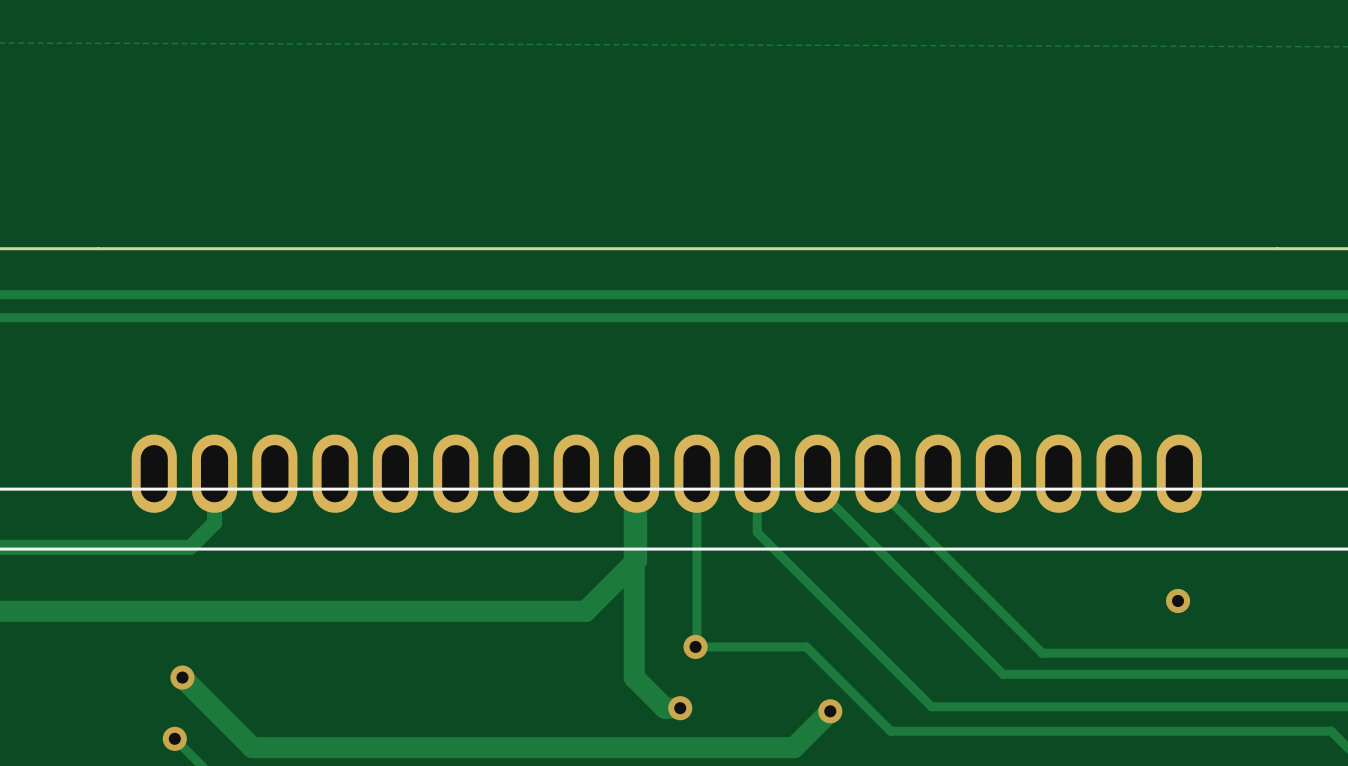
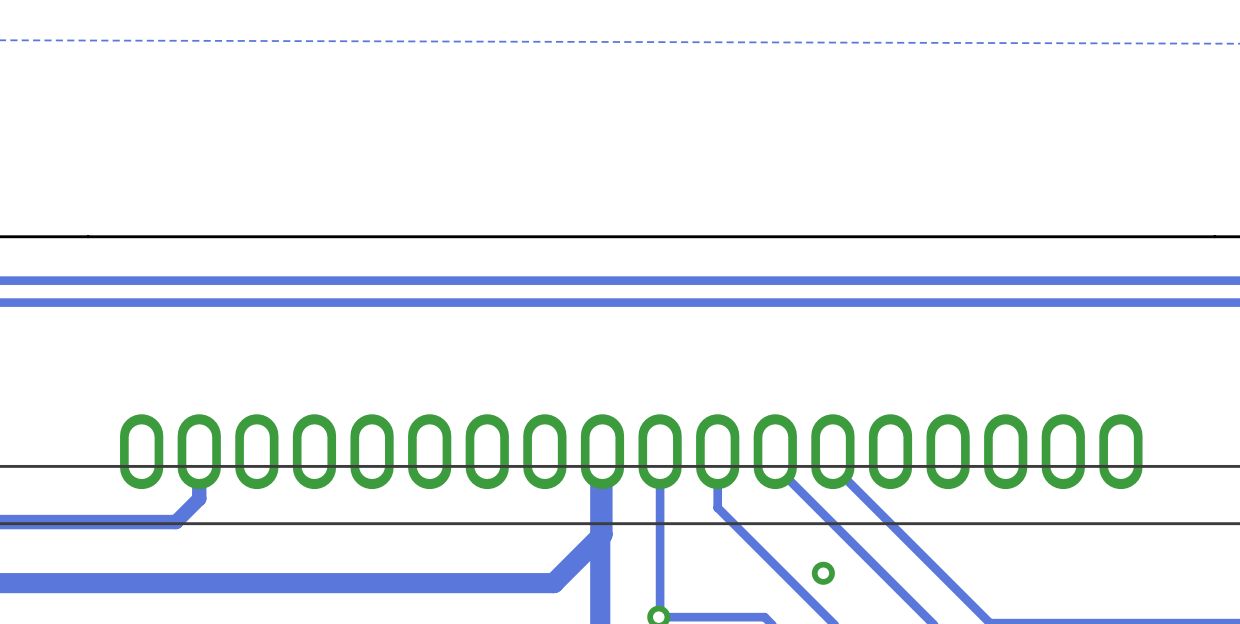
via: none -> (823, 573)
via: (1178, 600) -> none

